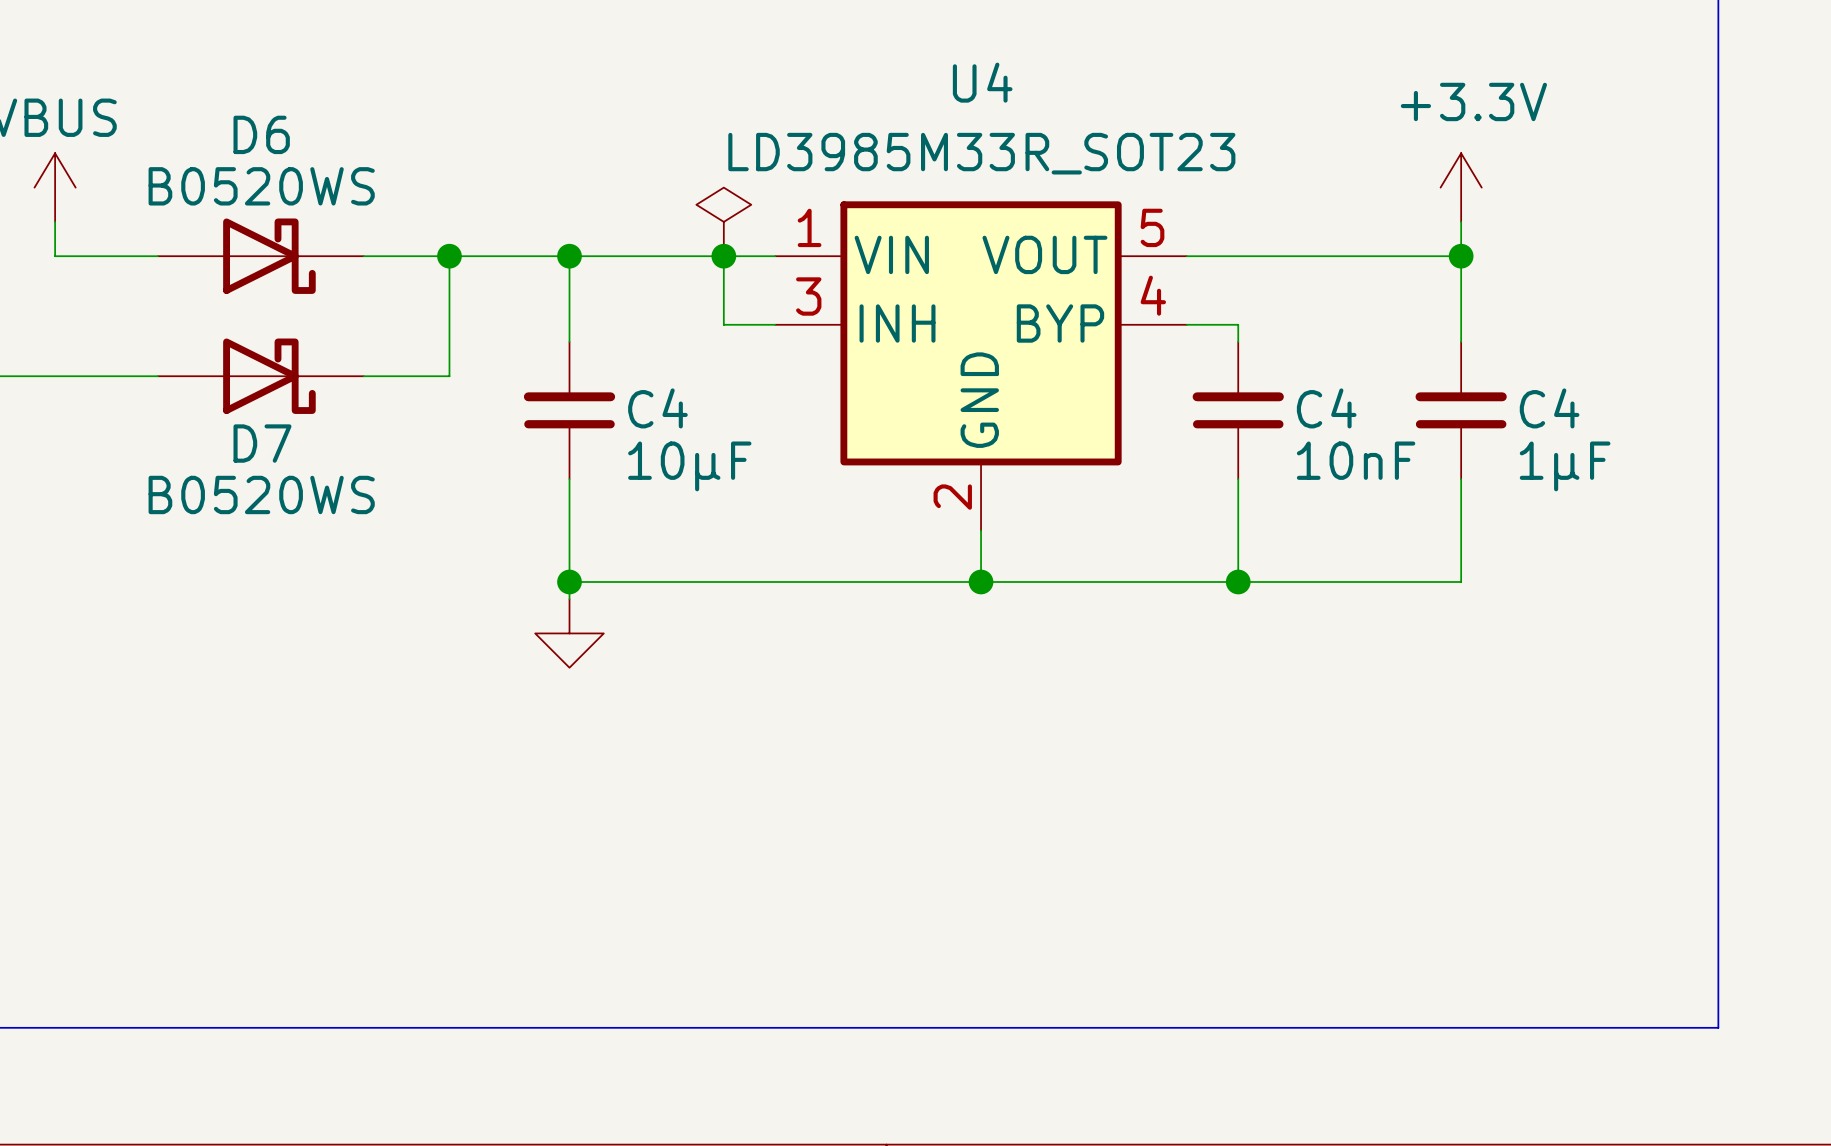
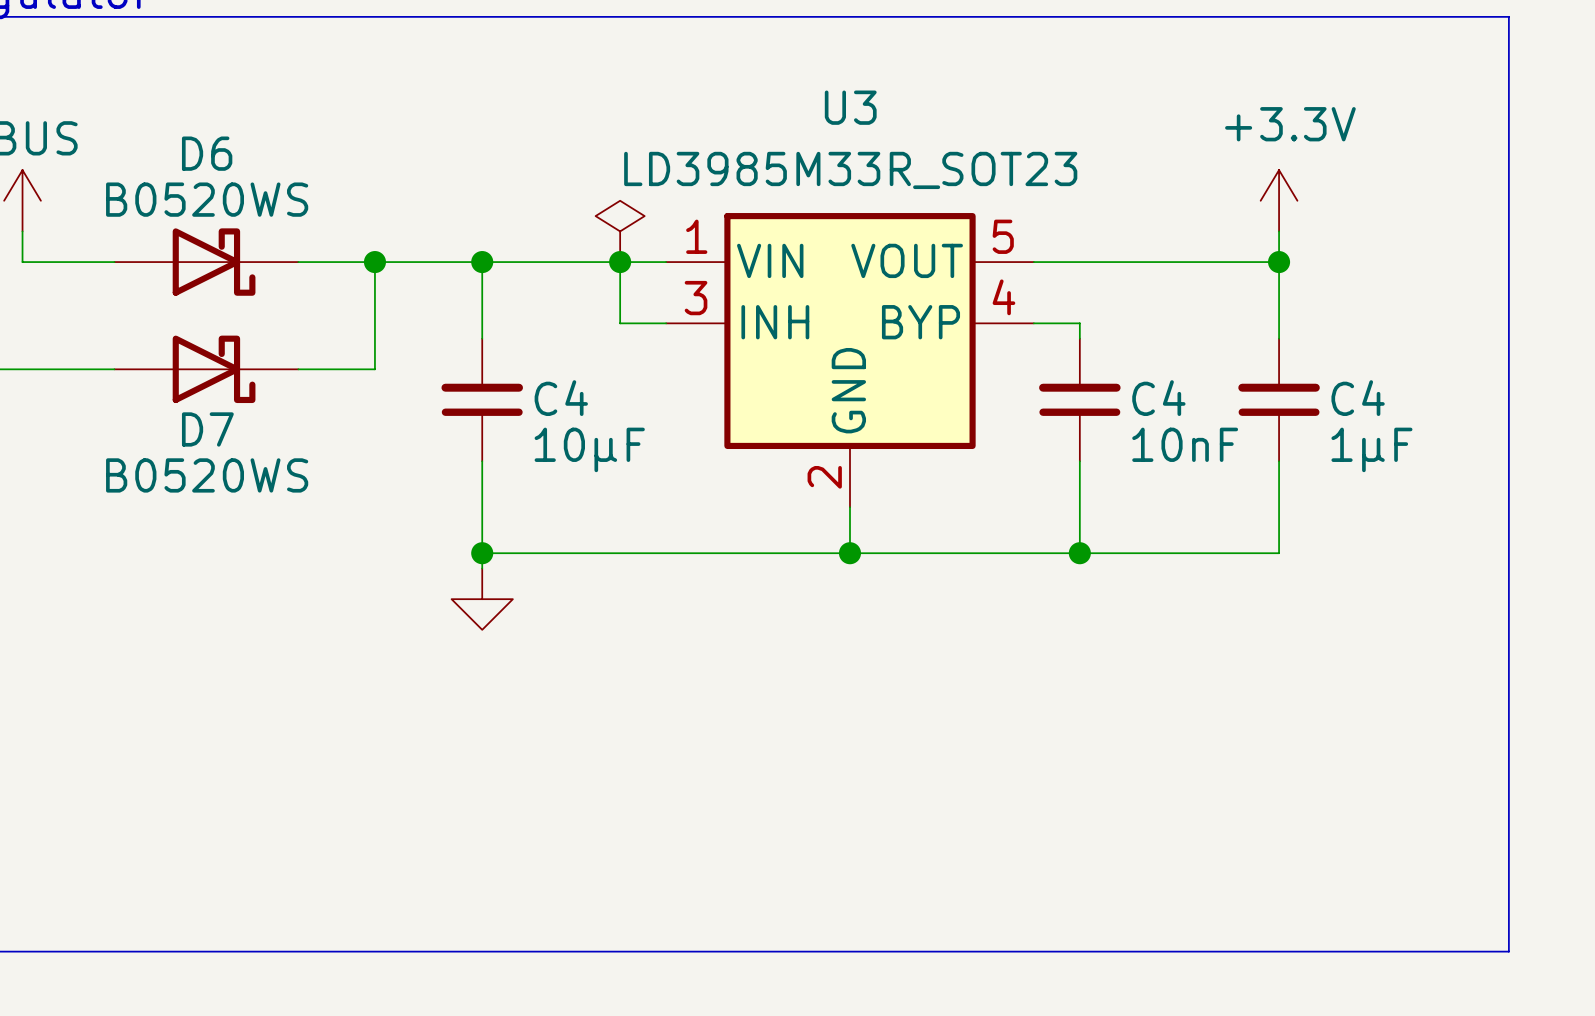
U4 name: U4 (982, 82) -> U3 (850, 107)

